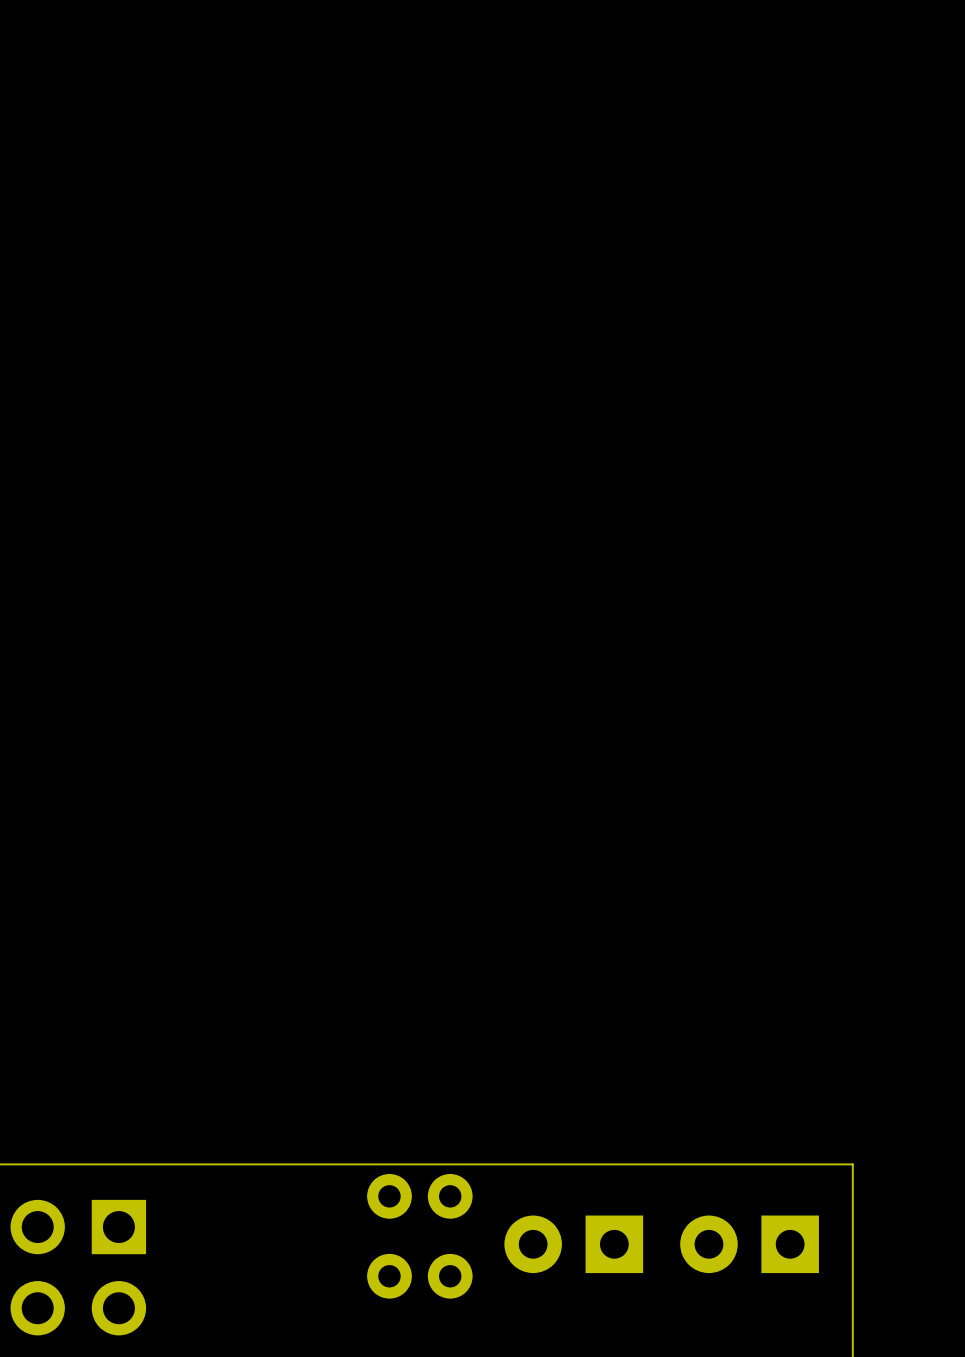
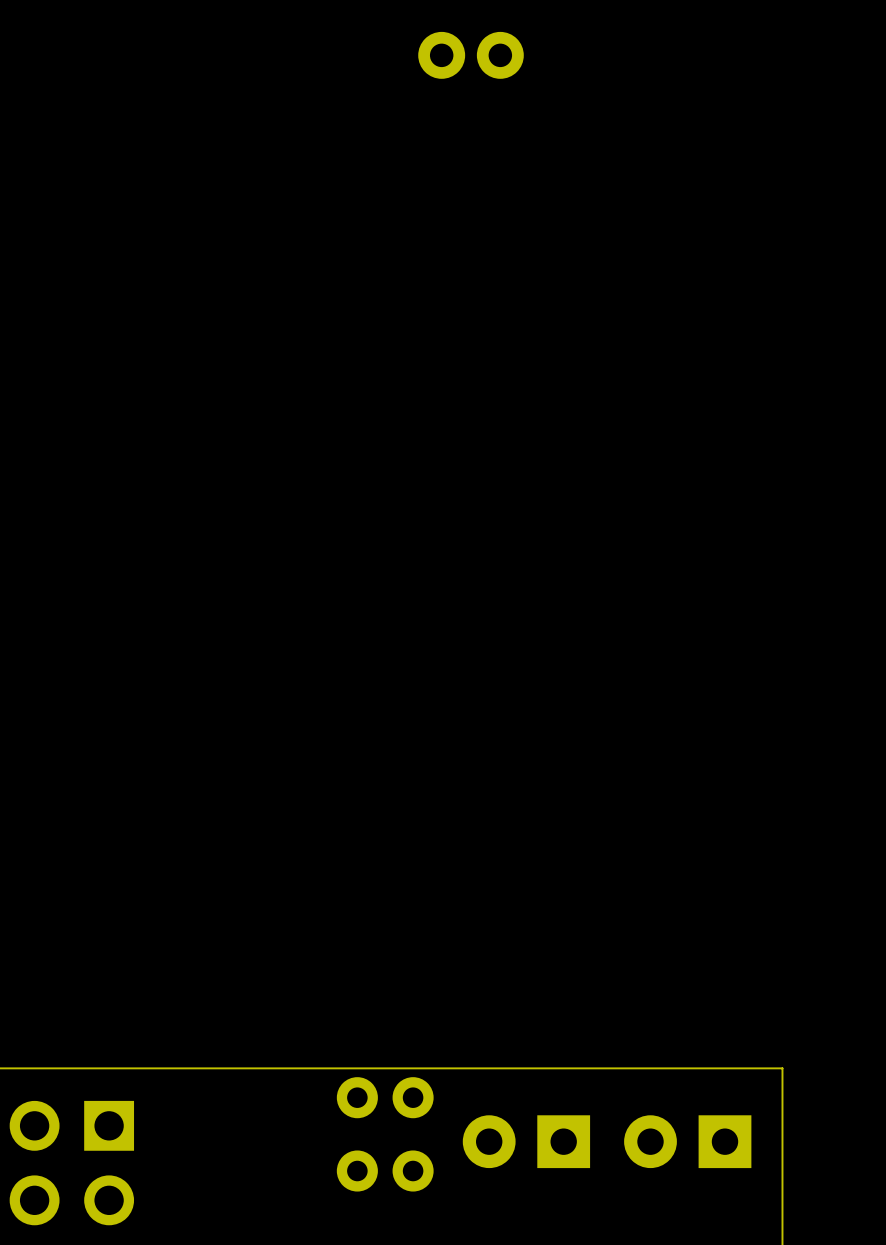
part: none -> (471, 55)

